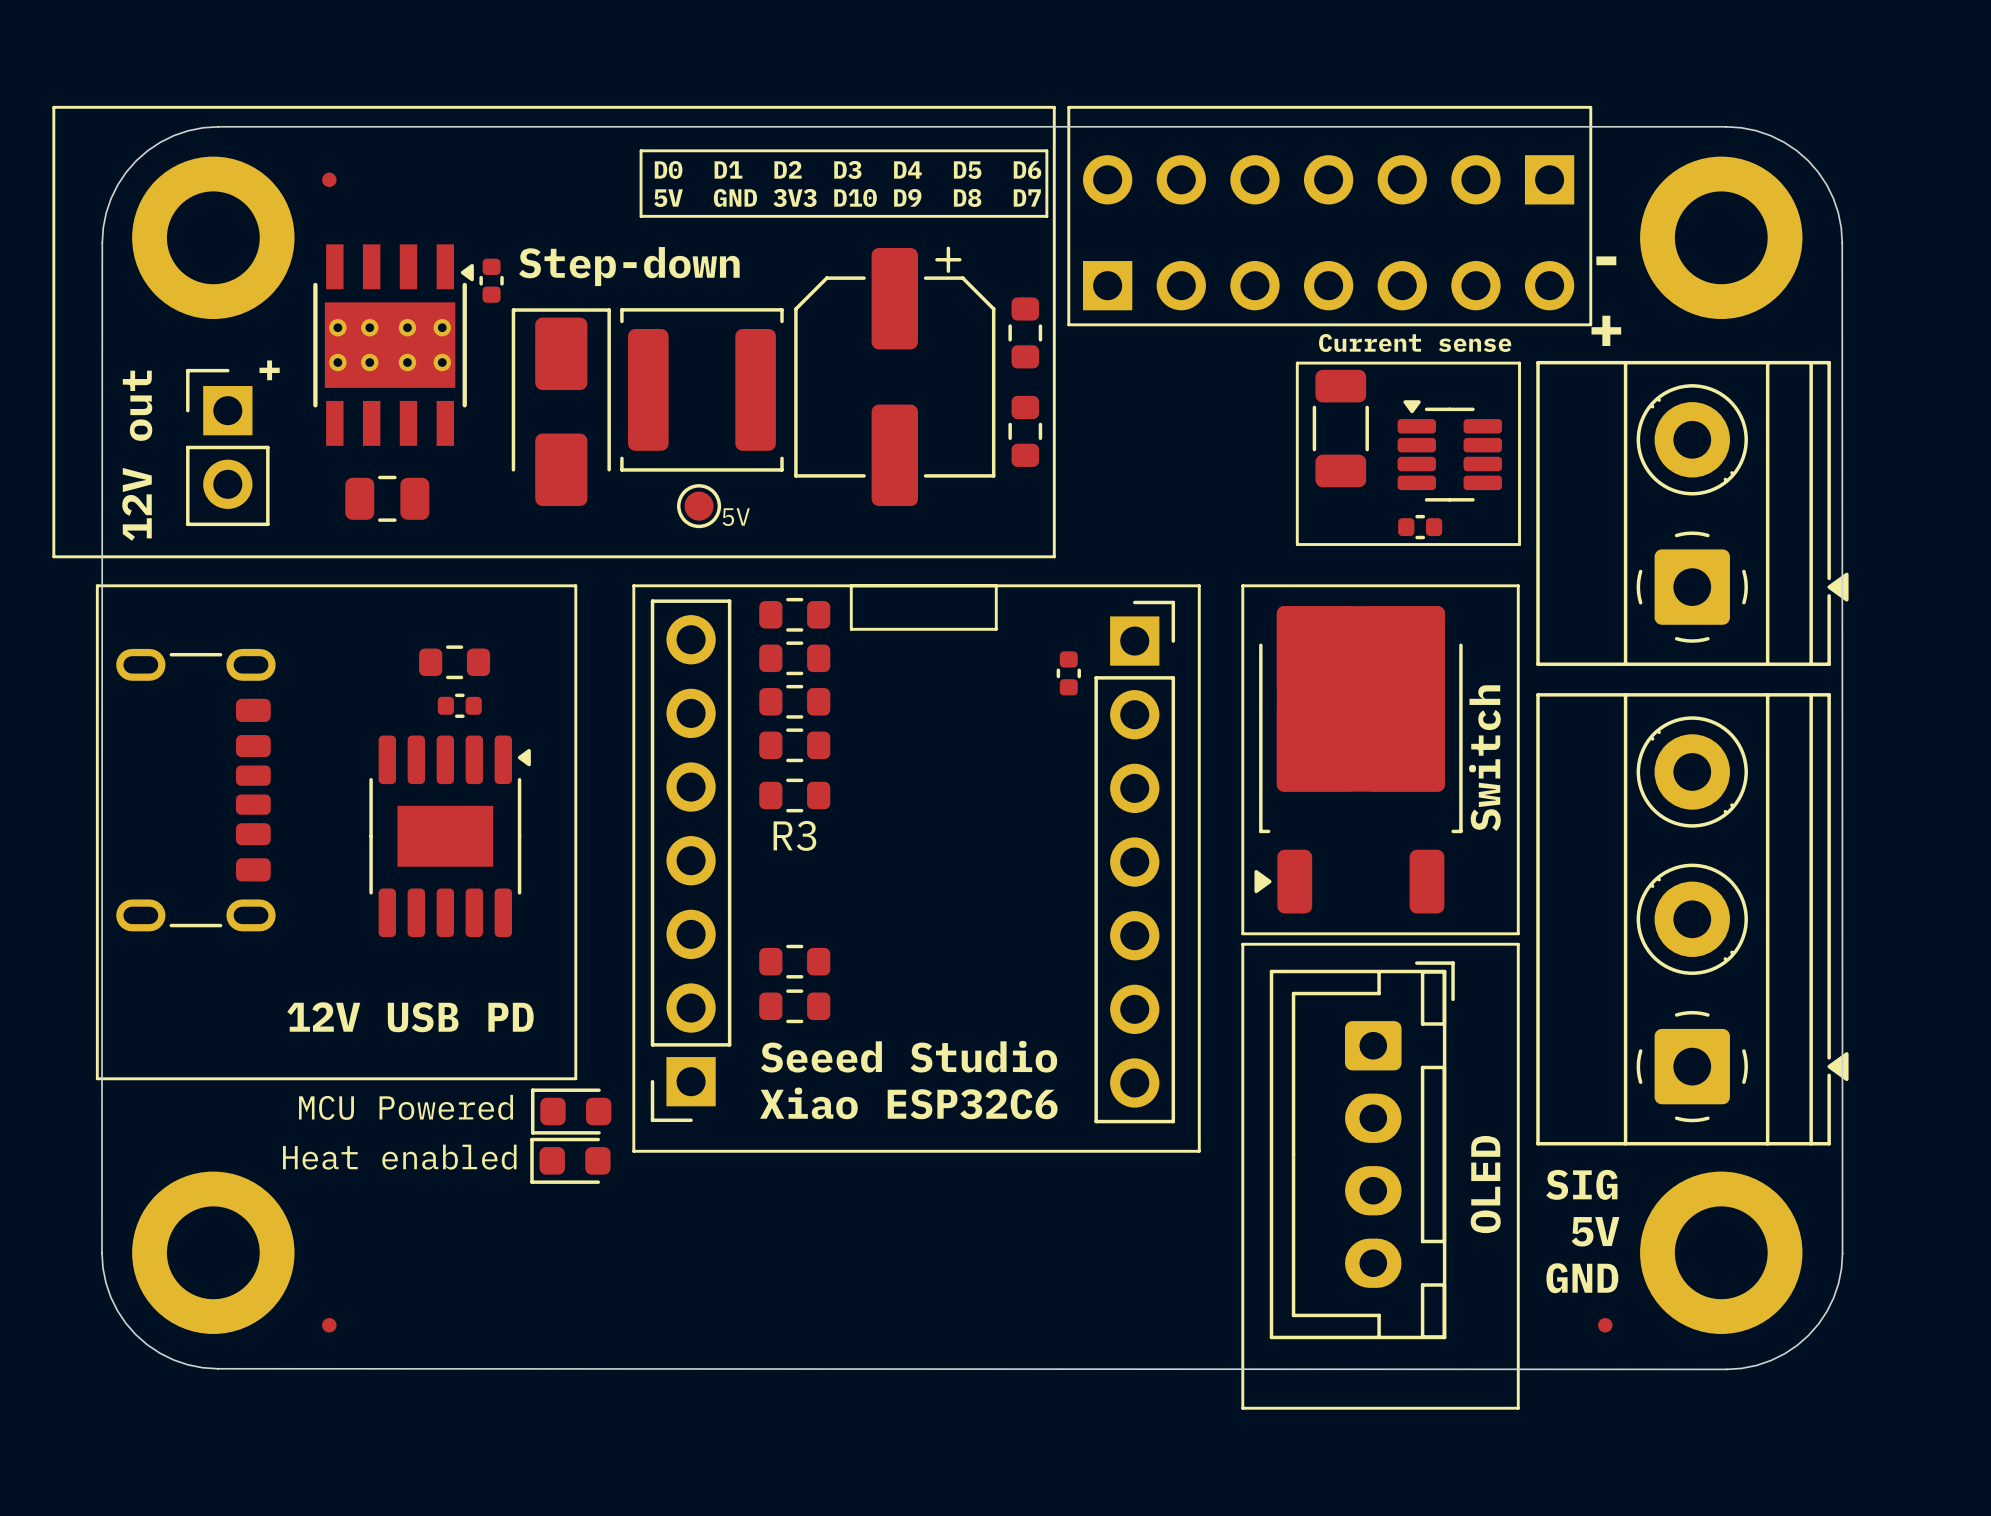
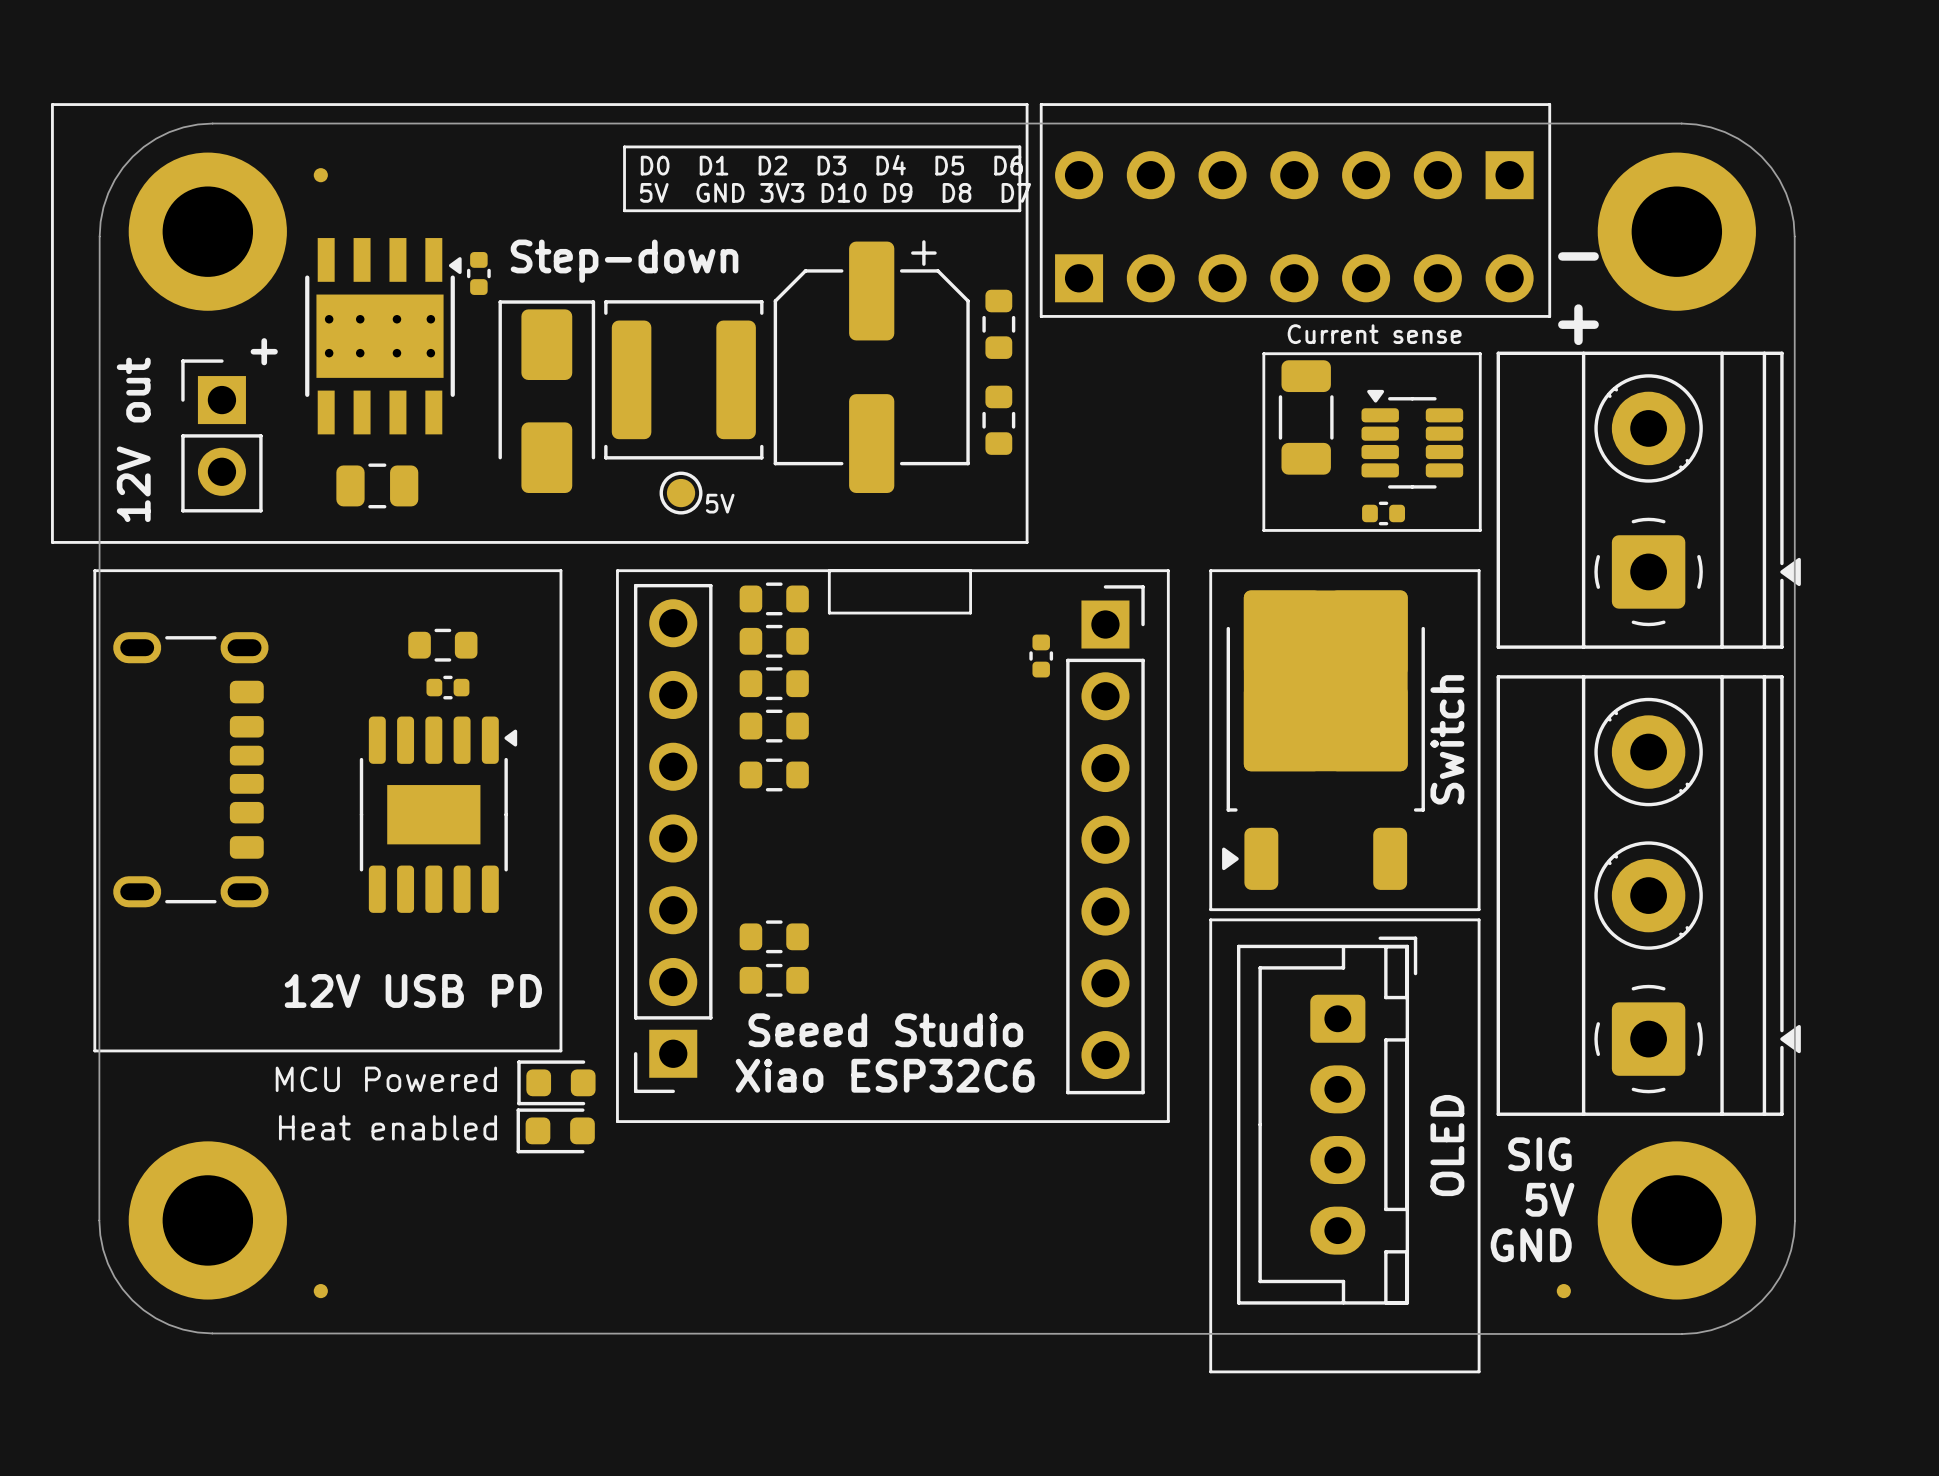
R3 name: R3 (794, 835) -> none

